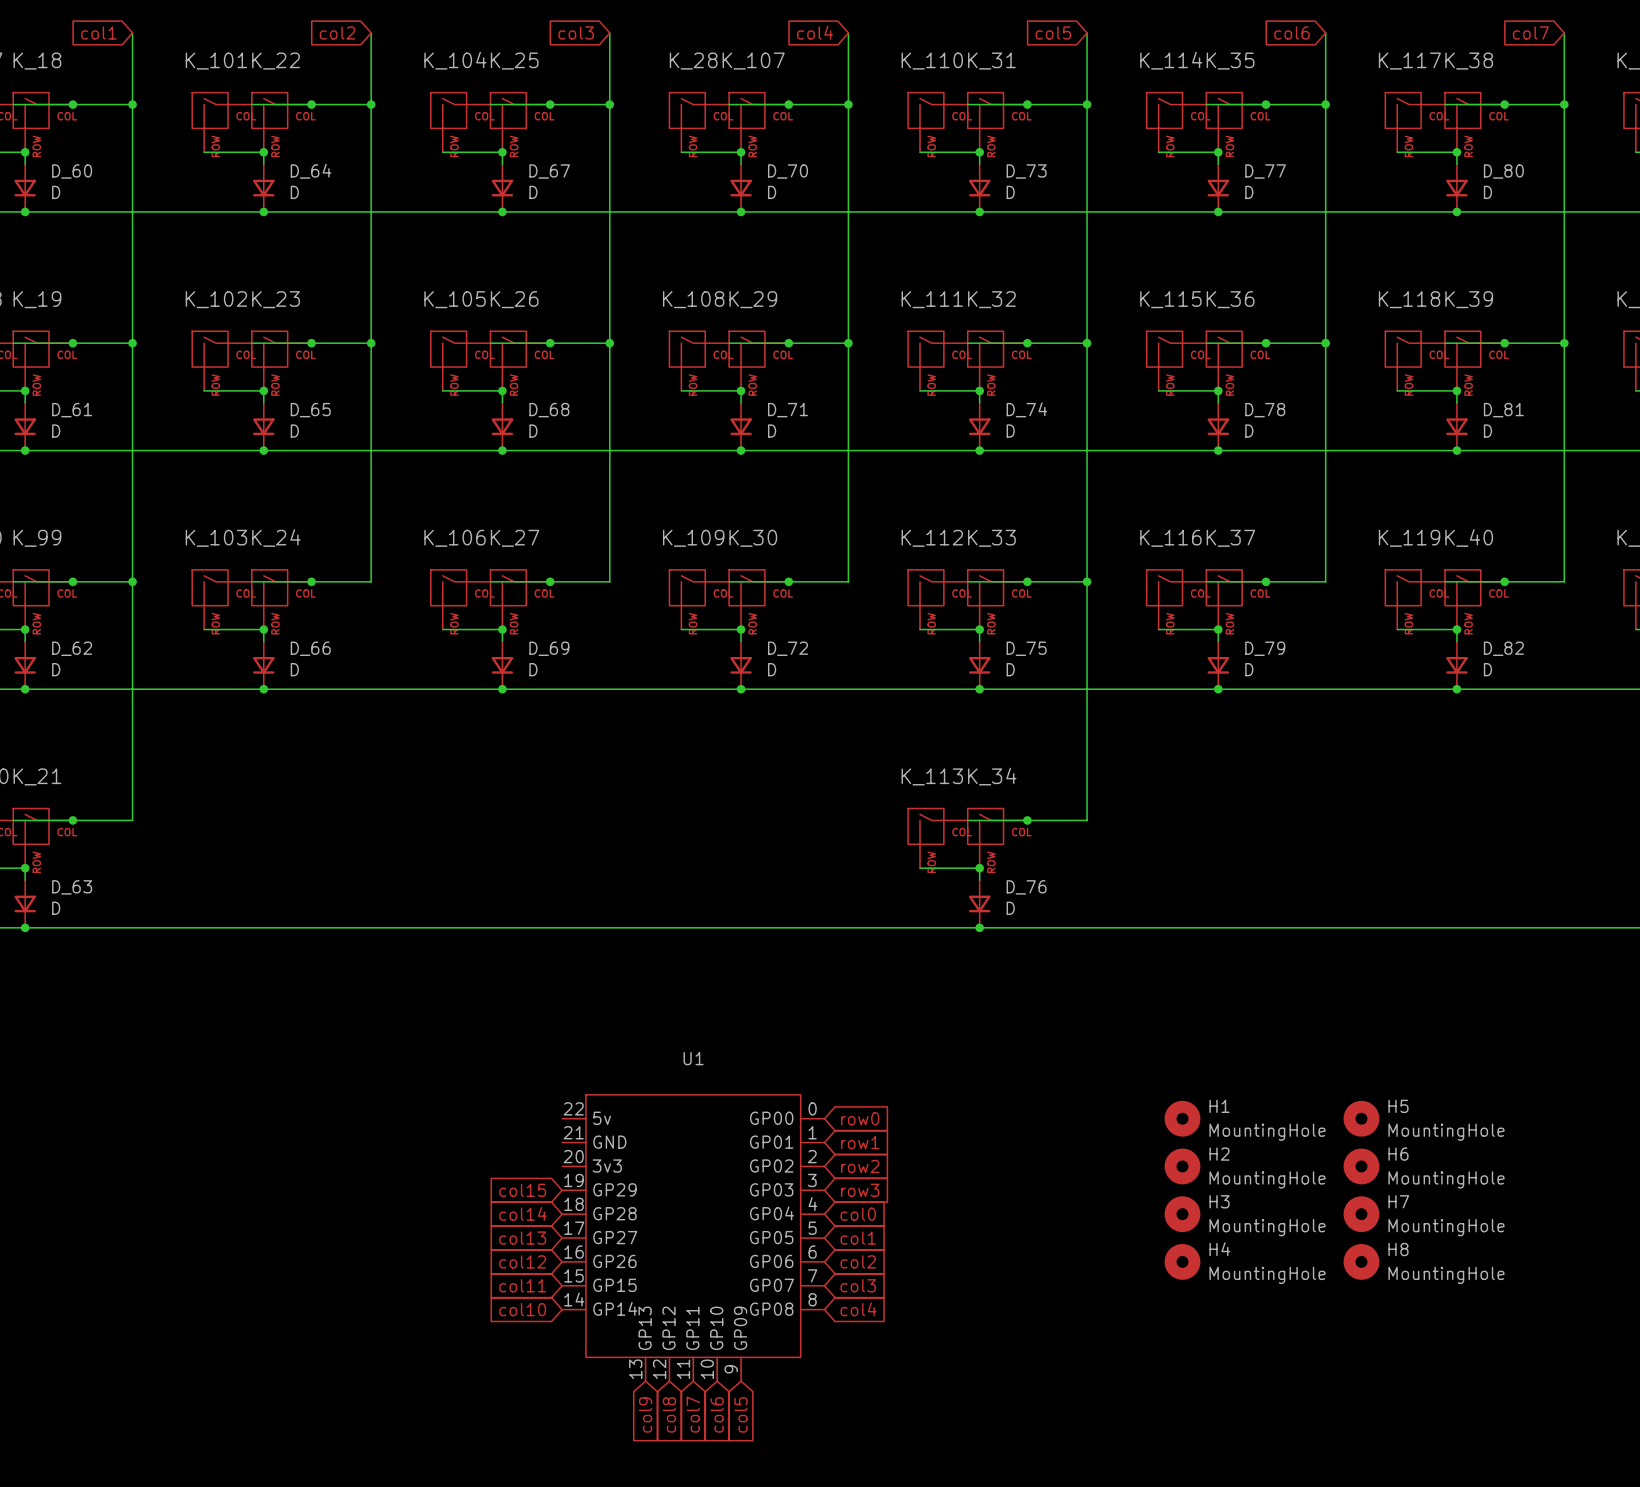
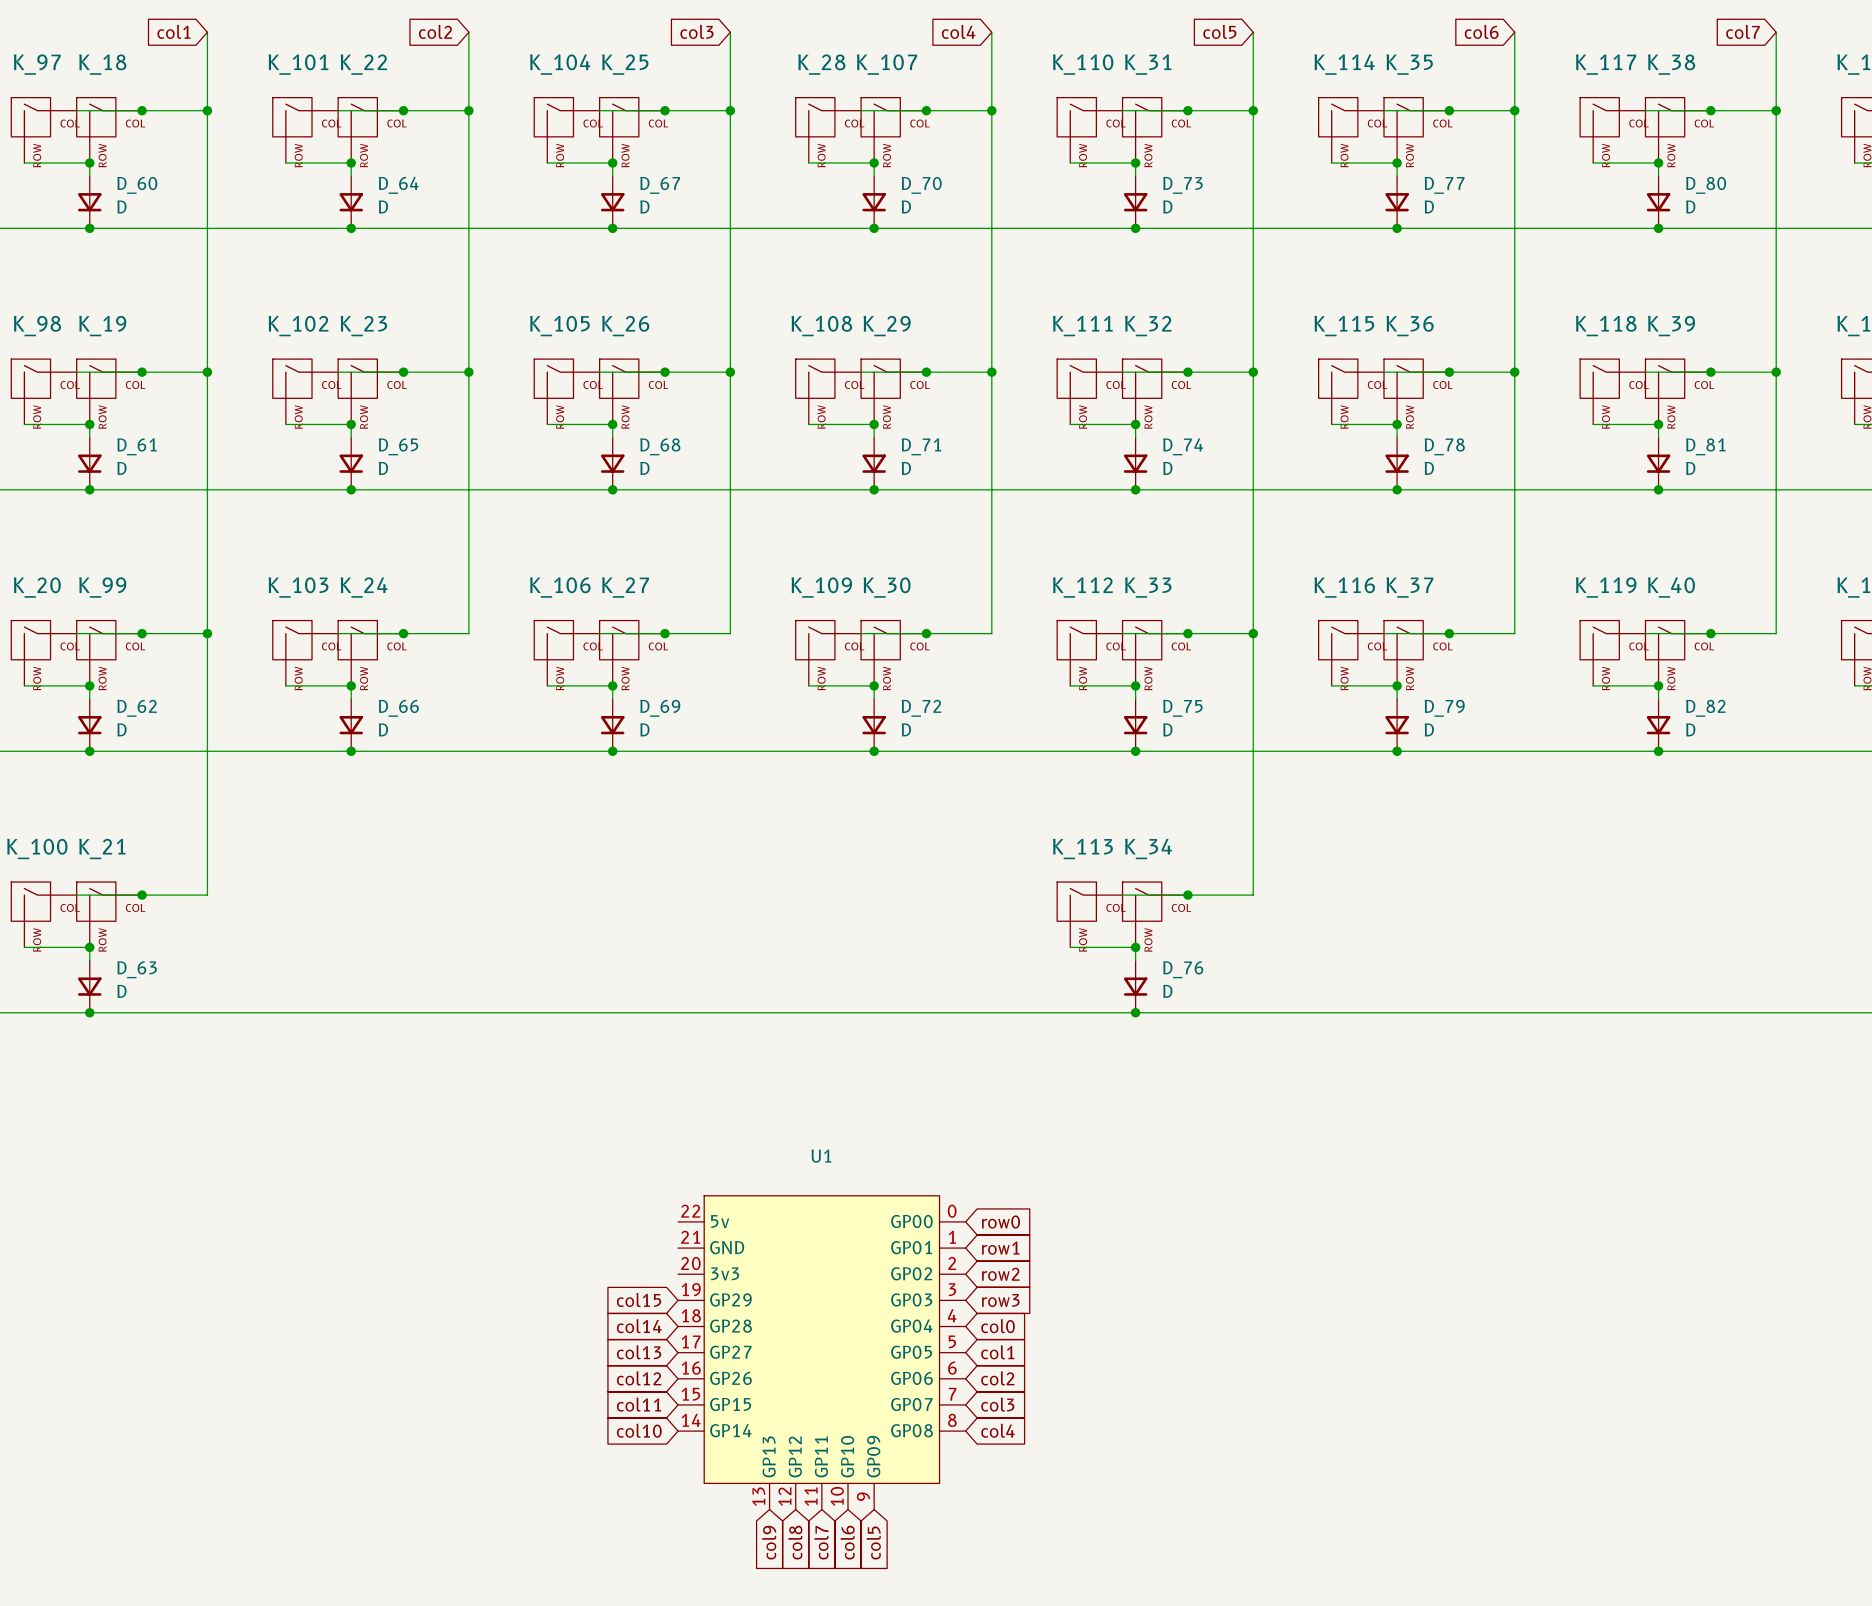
H1: MountingHole (1182, 1118) -> none
H5: MountingHole (1361, 1118) -> none
H2: MountingHole (1182, 1166) -> none
H6: MountingHole (1361, 1166) -> none
H3: MountingHole (1182, 1214) -> none
H7: MountingHole (1361, 1214) -> none
H4: MountingHole (1182, 1261) -> none
H8: MountingHole (1361, 1261) -> none

